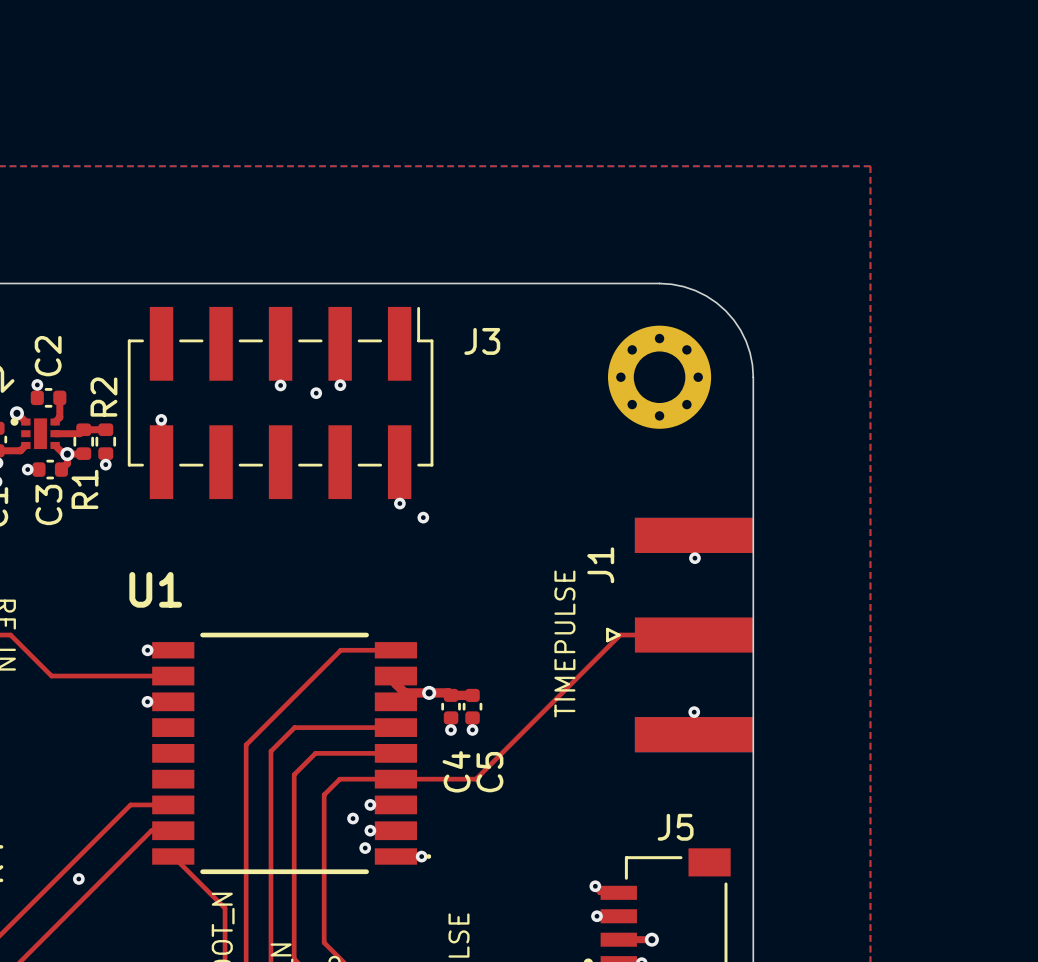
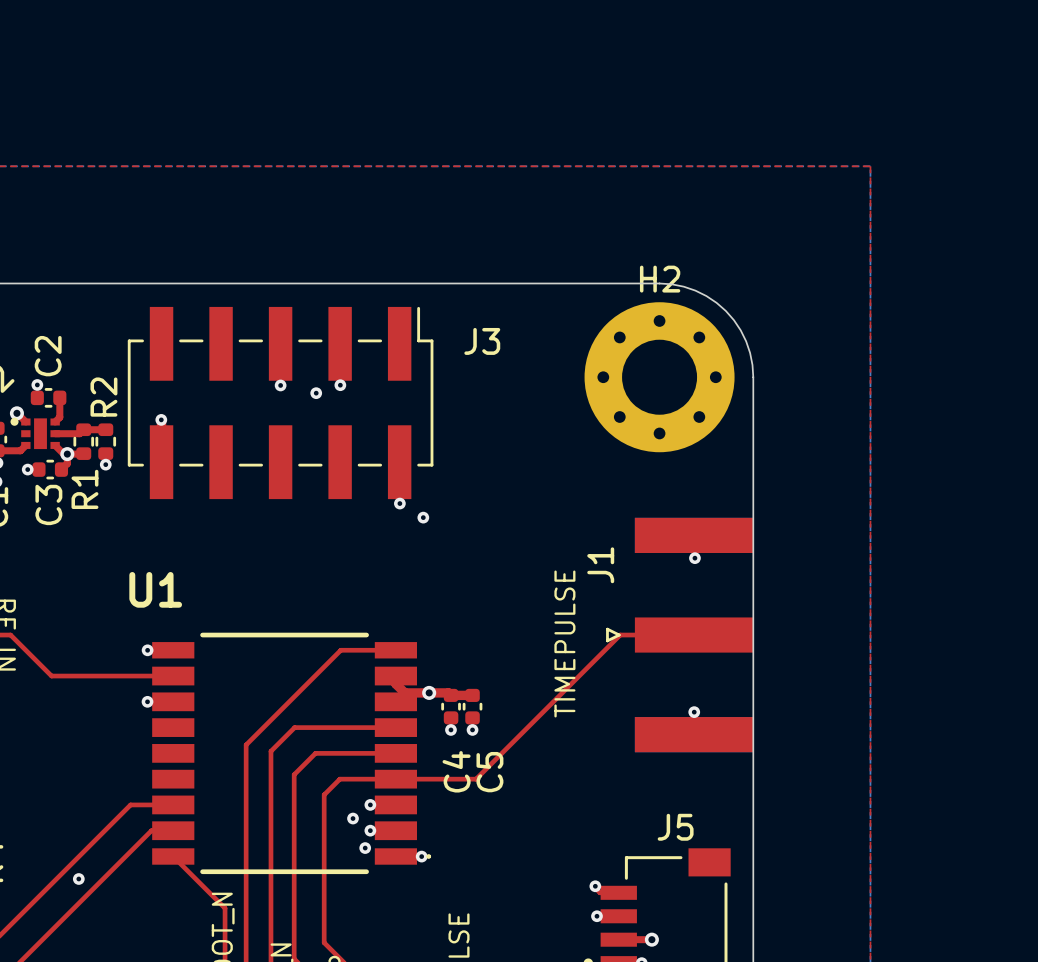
part: (659, 377) -> none
H2: none -> (659, 377)

